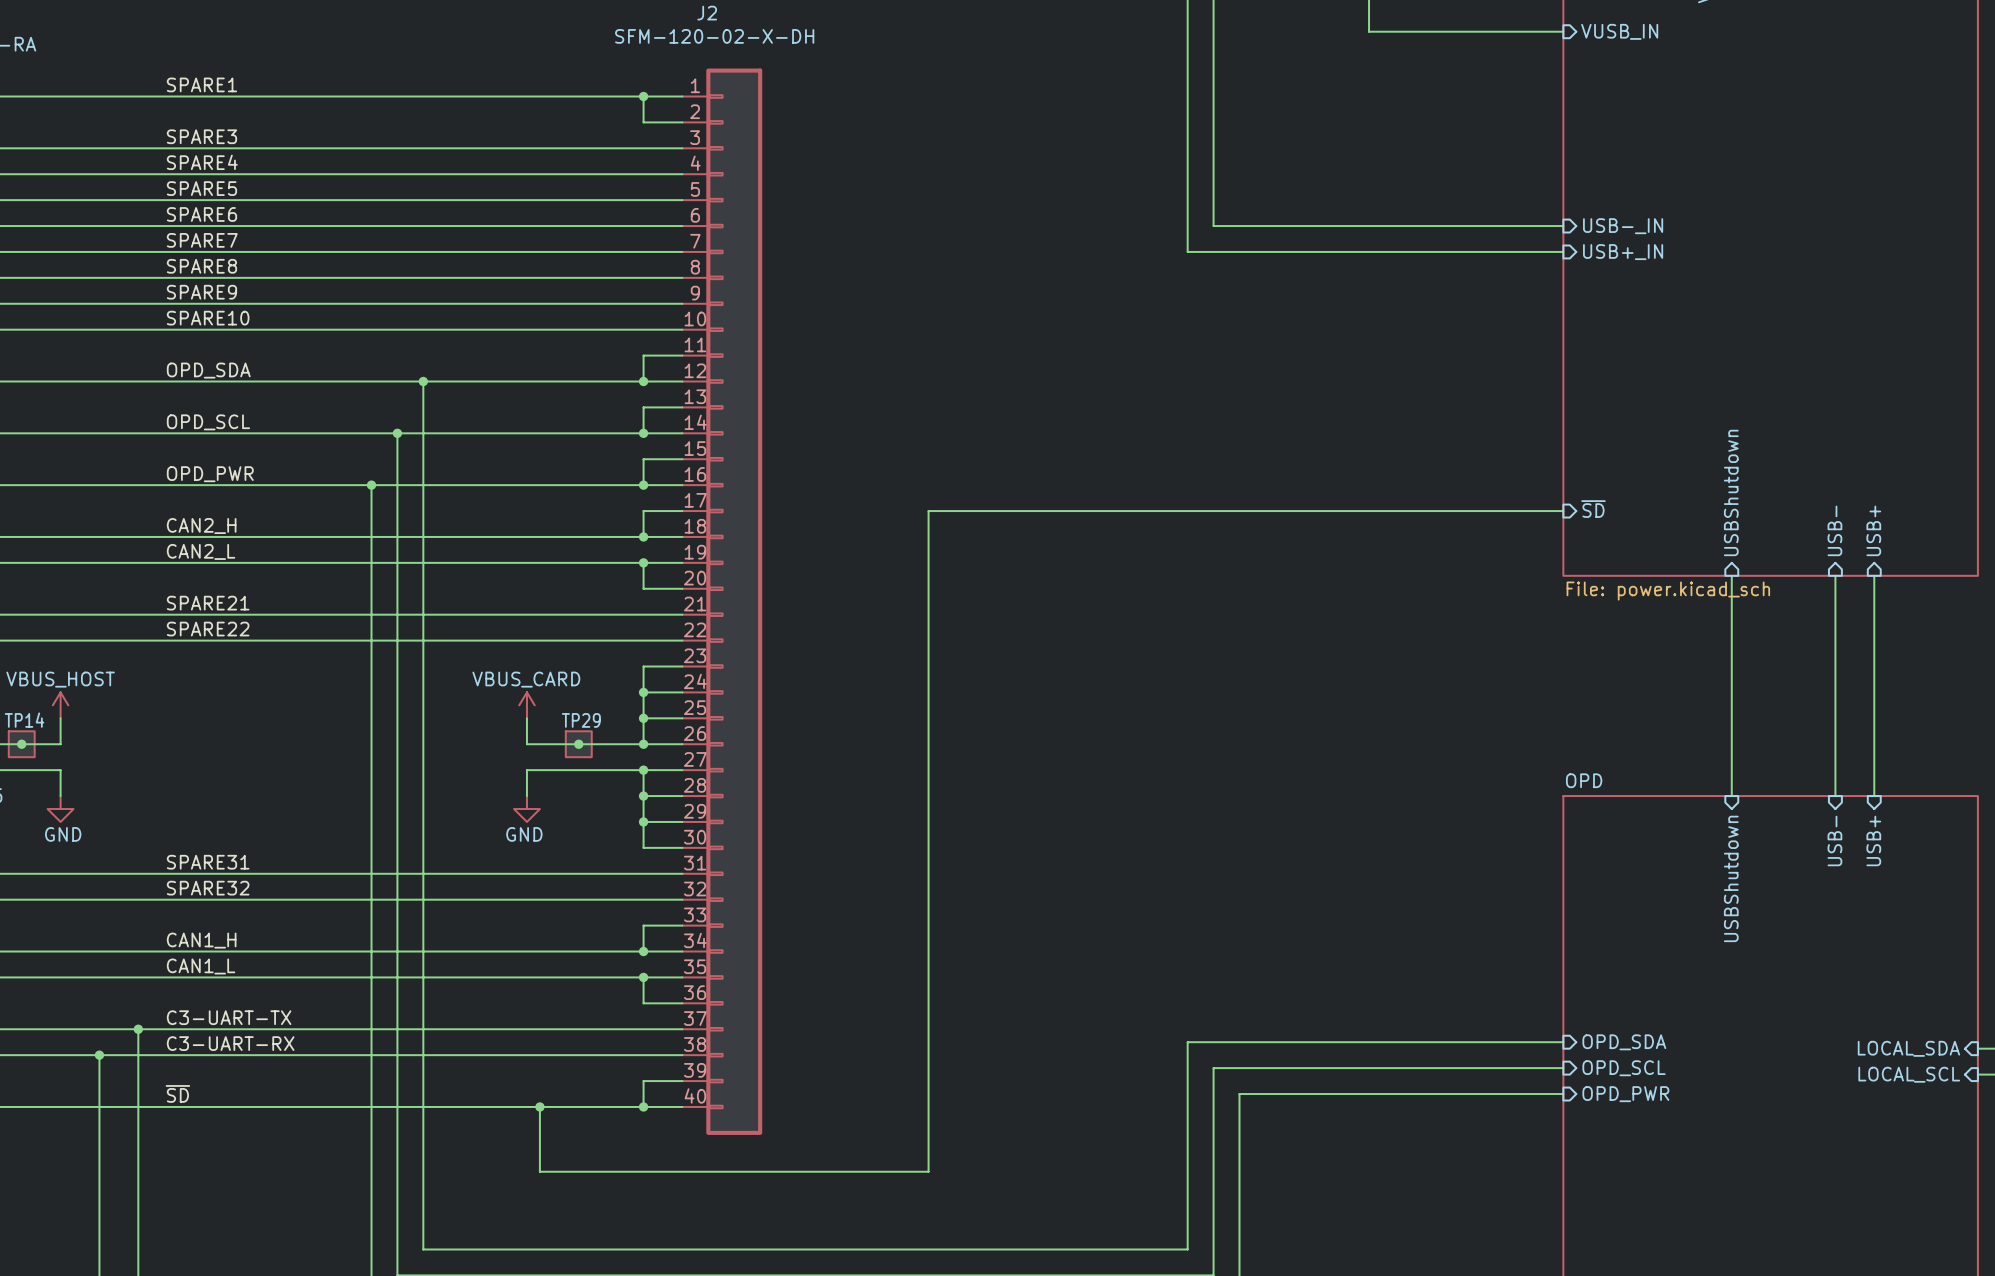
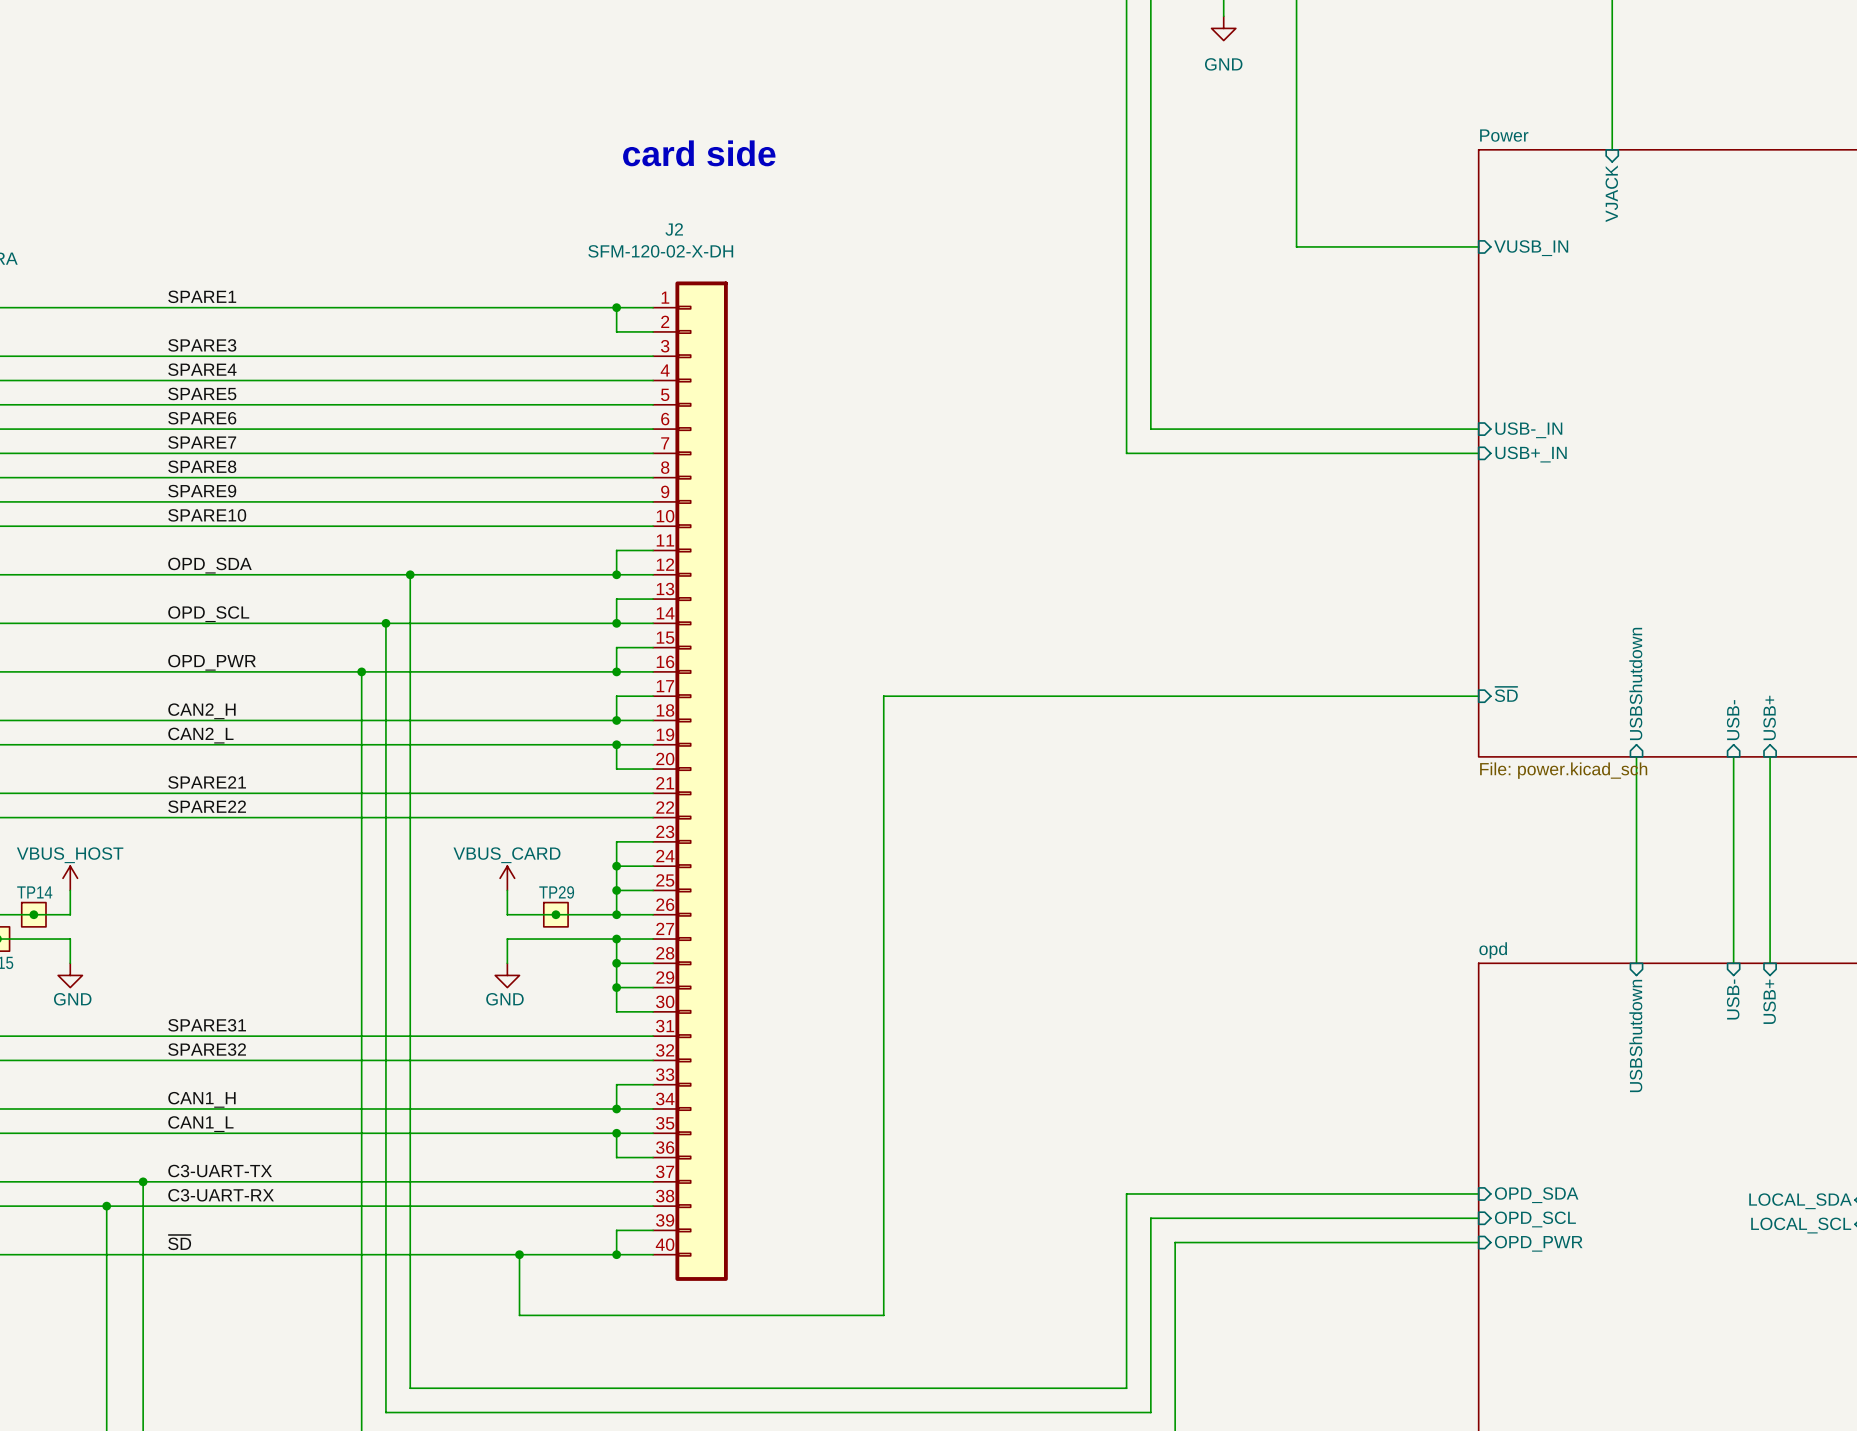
sheet OPD name: OPD (1584, 780) -> opd (1493, 950)

